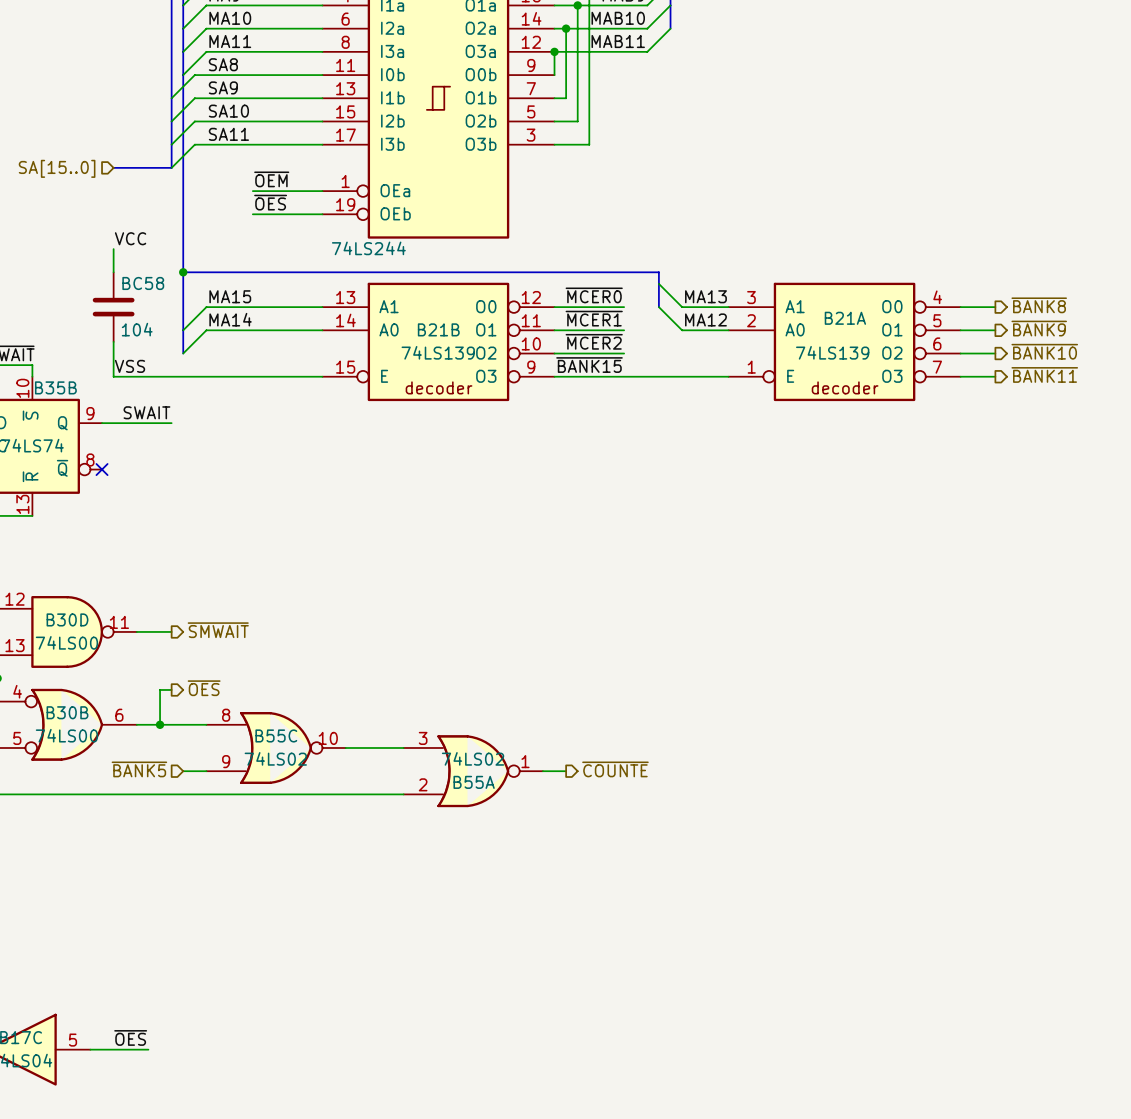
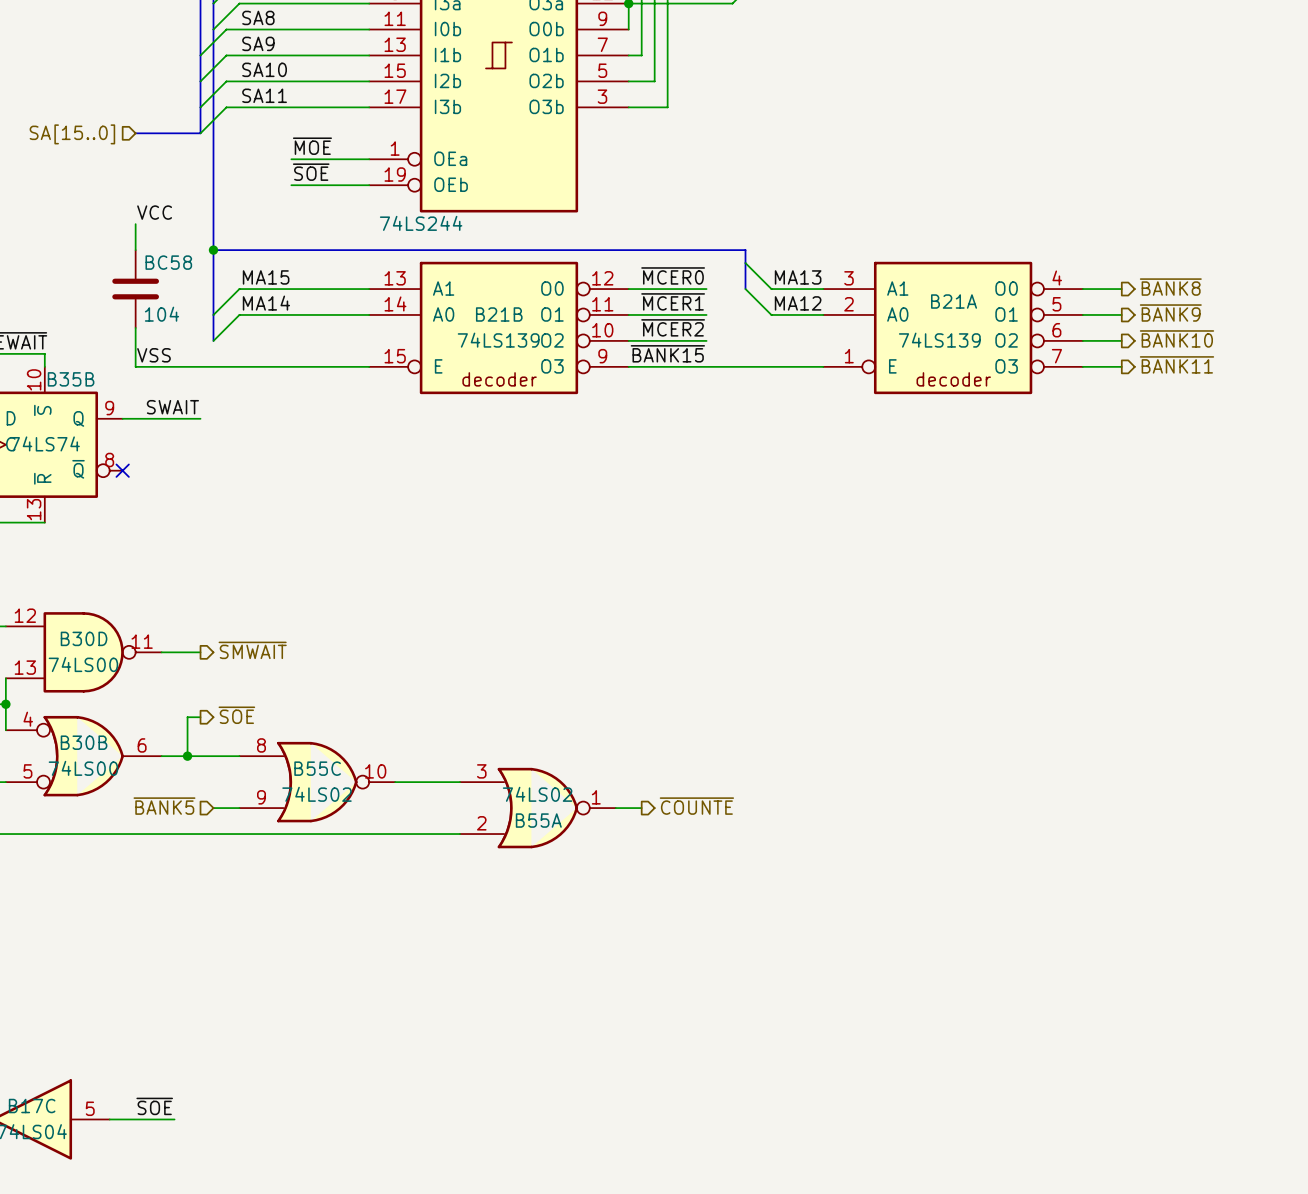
label: ~{OEM} (271, 179) -> ~{MOE} (312, 146)
label: ~{OES} (270, 202) -> ~{SOE} (311, 172)
hierarchical label: ~{OES} (204, 688) -> ~{SOE} (236, 715)
label: ~{OES} (130, 1037) -> ~{SOE} (154, 1106)

